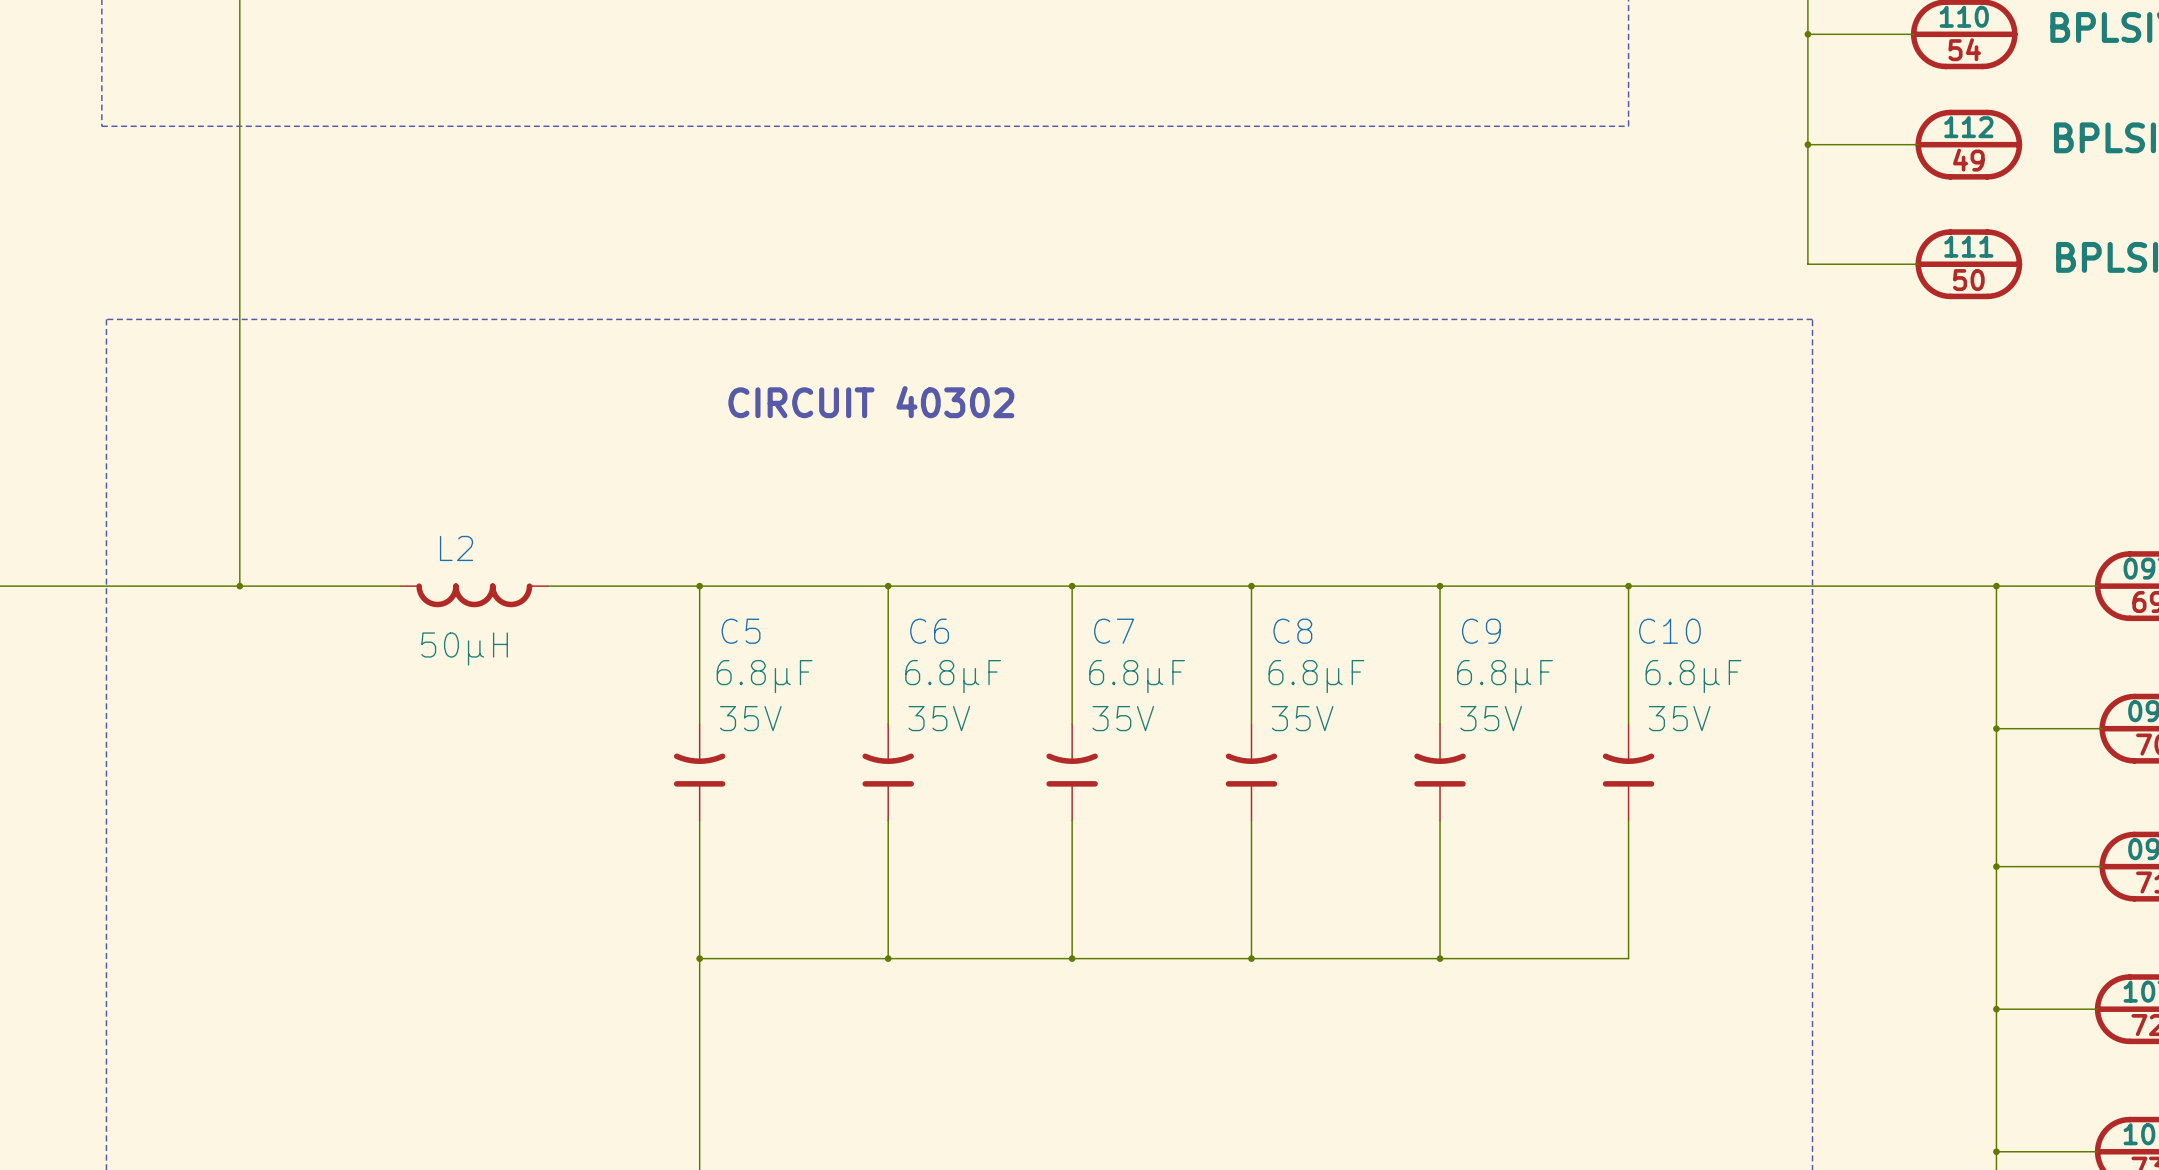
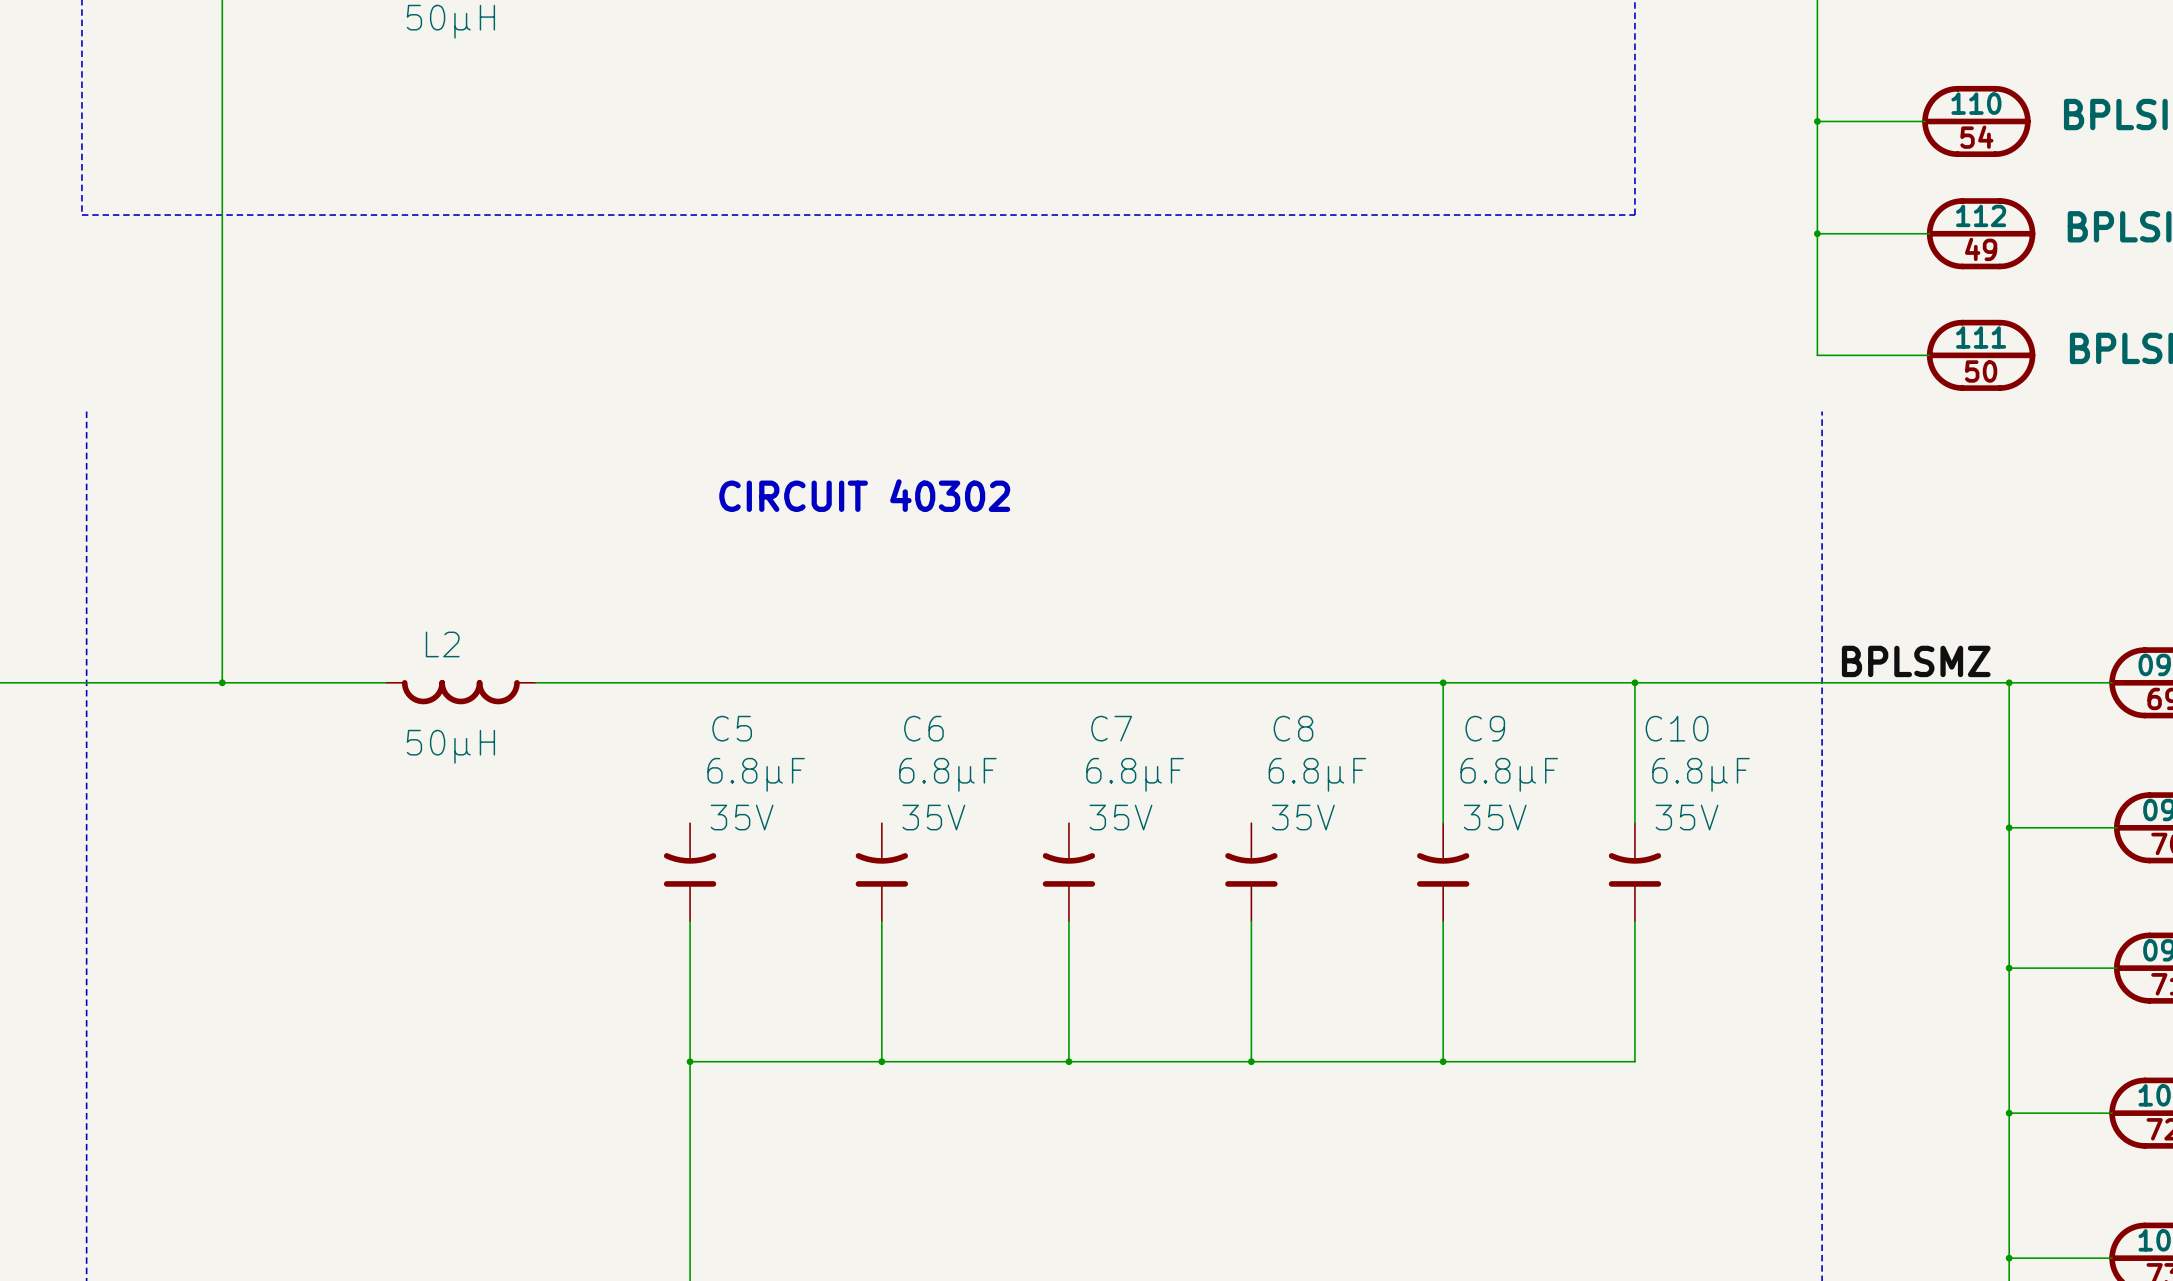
line: (106, 319) (1812, 319) -> none
label: none -> BPLSMZ (1916, 661)
wire: (699, 586) (699, 724) -> none
junction: (699, 586) -> none
wire: (888, 586) (888, 724) -> none
junction: (888, 586) -> none
wire: (1072, 586) (1072, 724) -> none
junction: (1072, 586) -> none
wire: (1251, 586) (1251, 724) -> none
junction: (1251, 586) -> none

